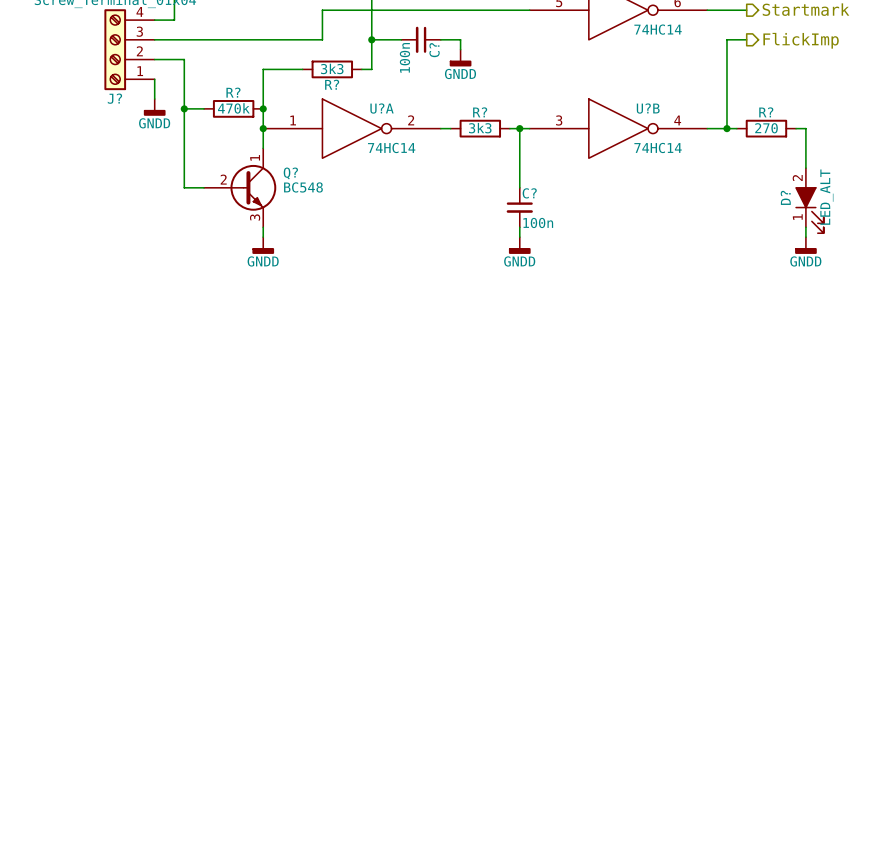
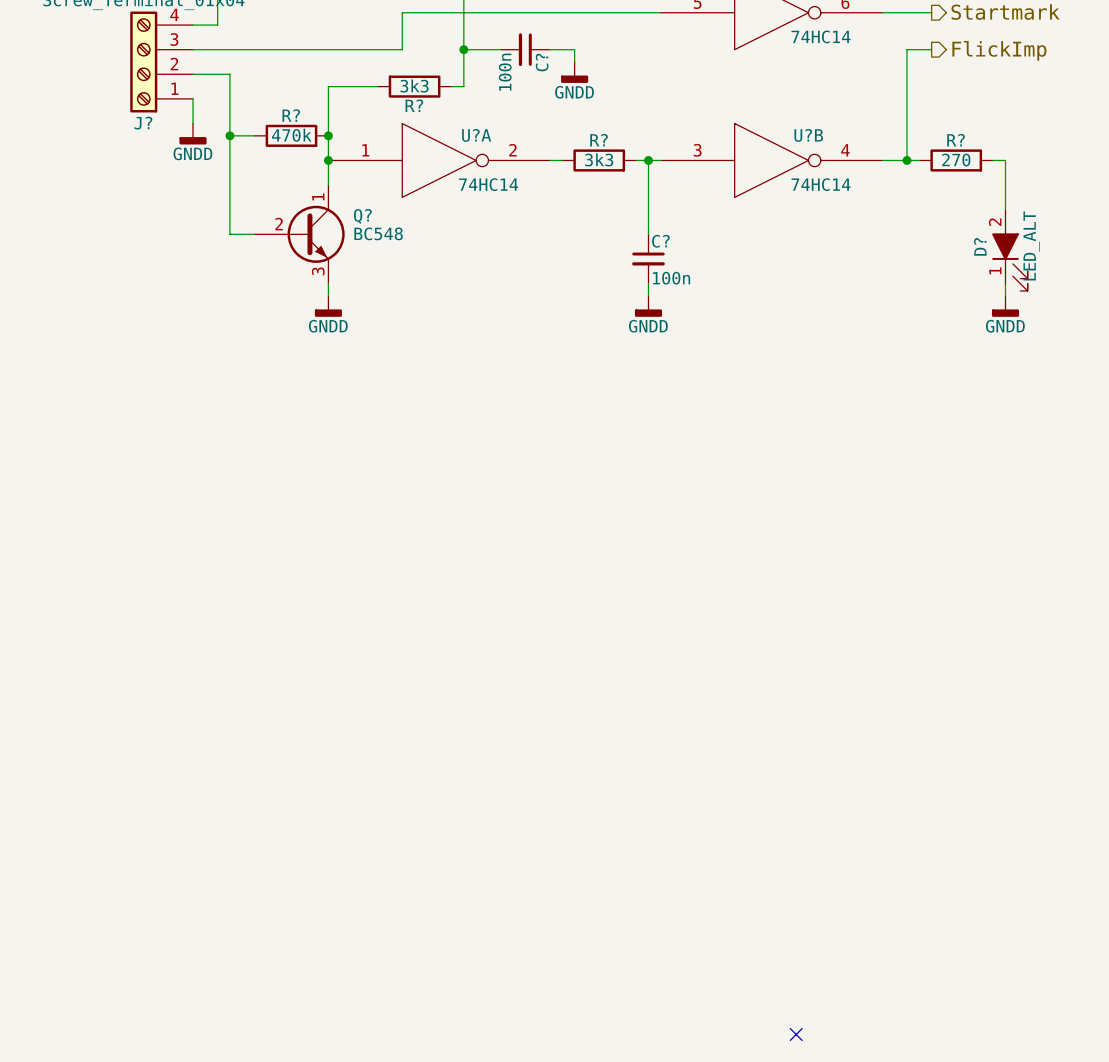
no-connect mark: none -> (796, 1034)

